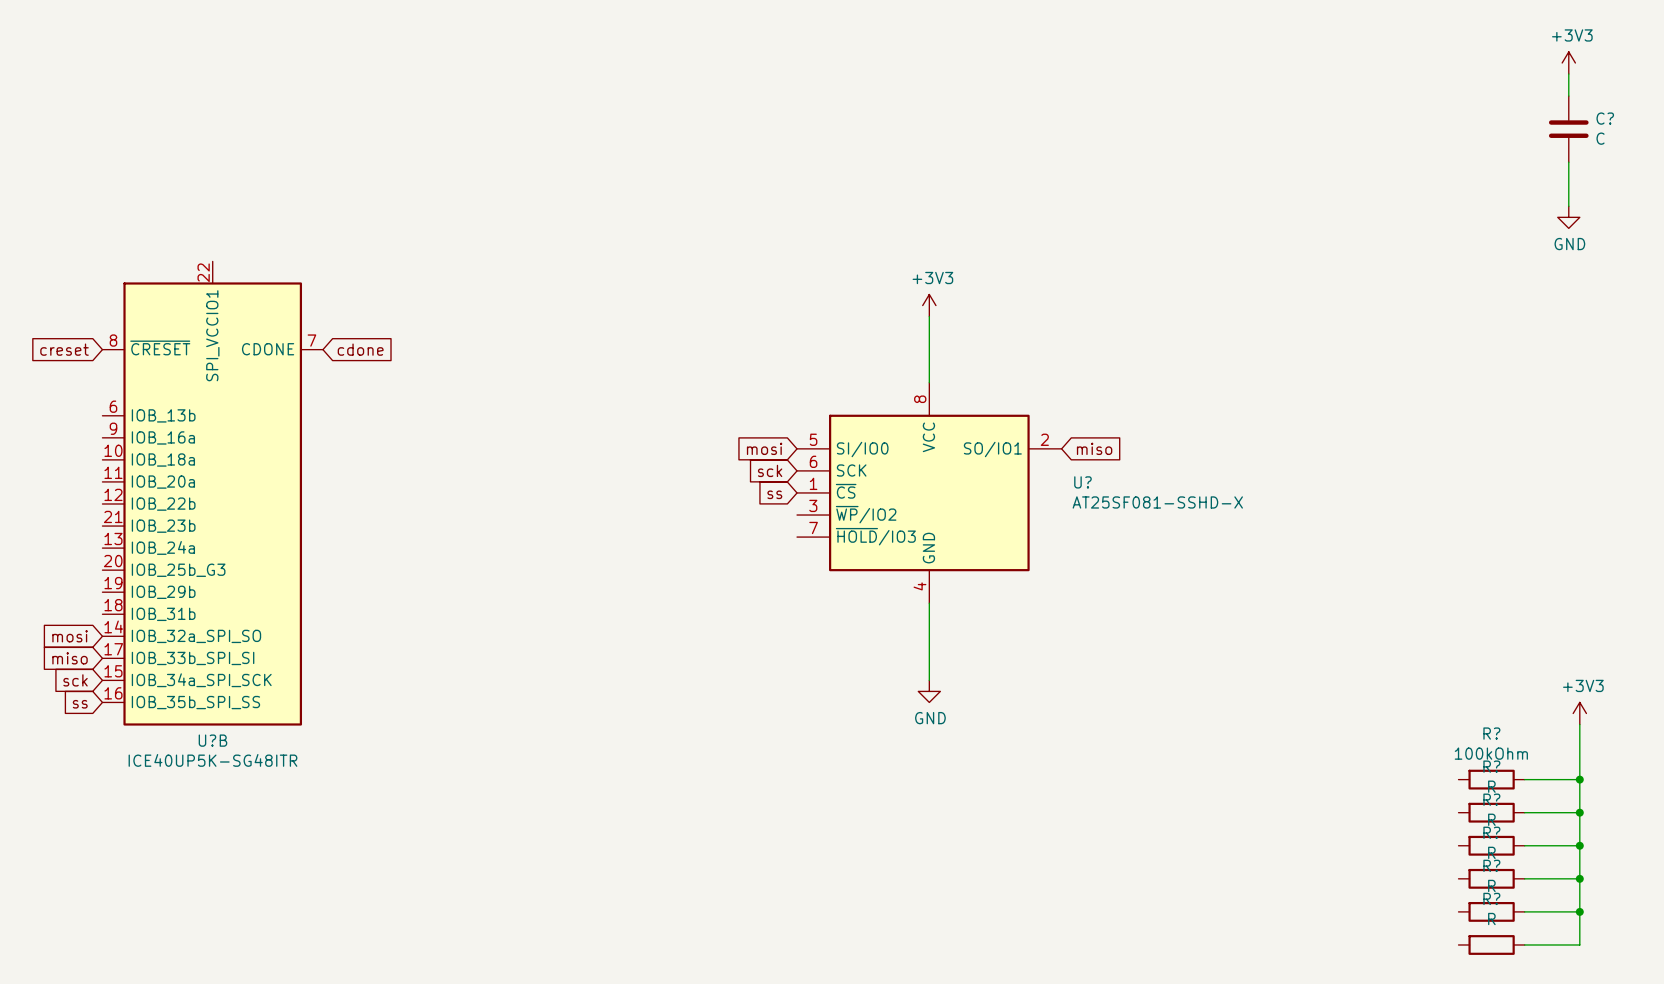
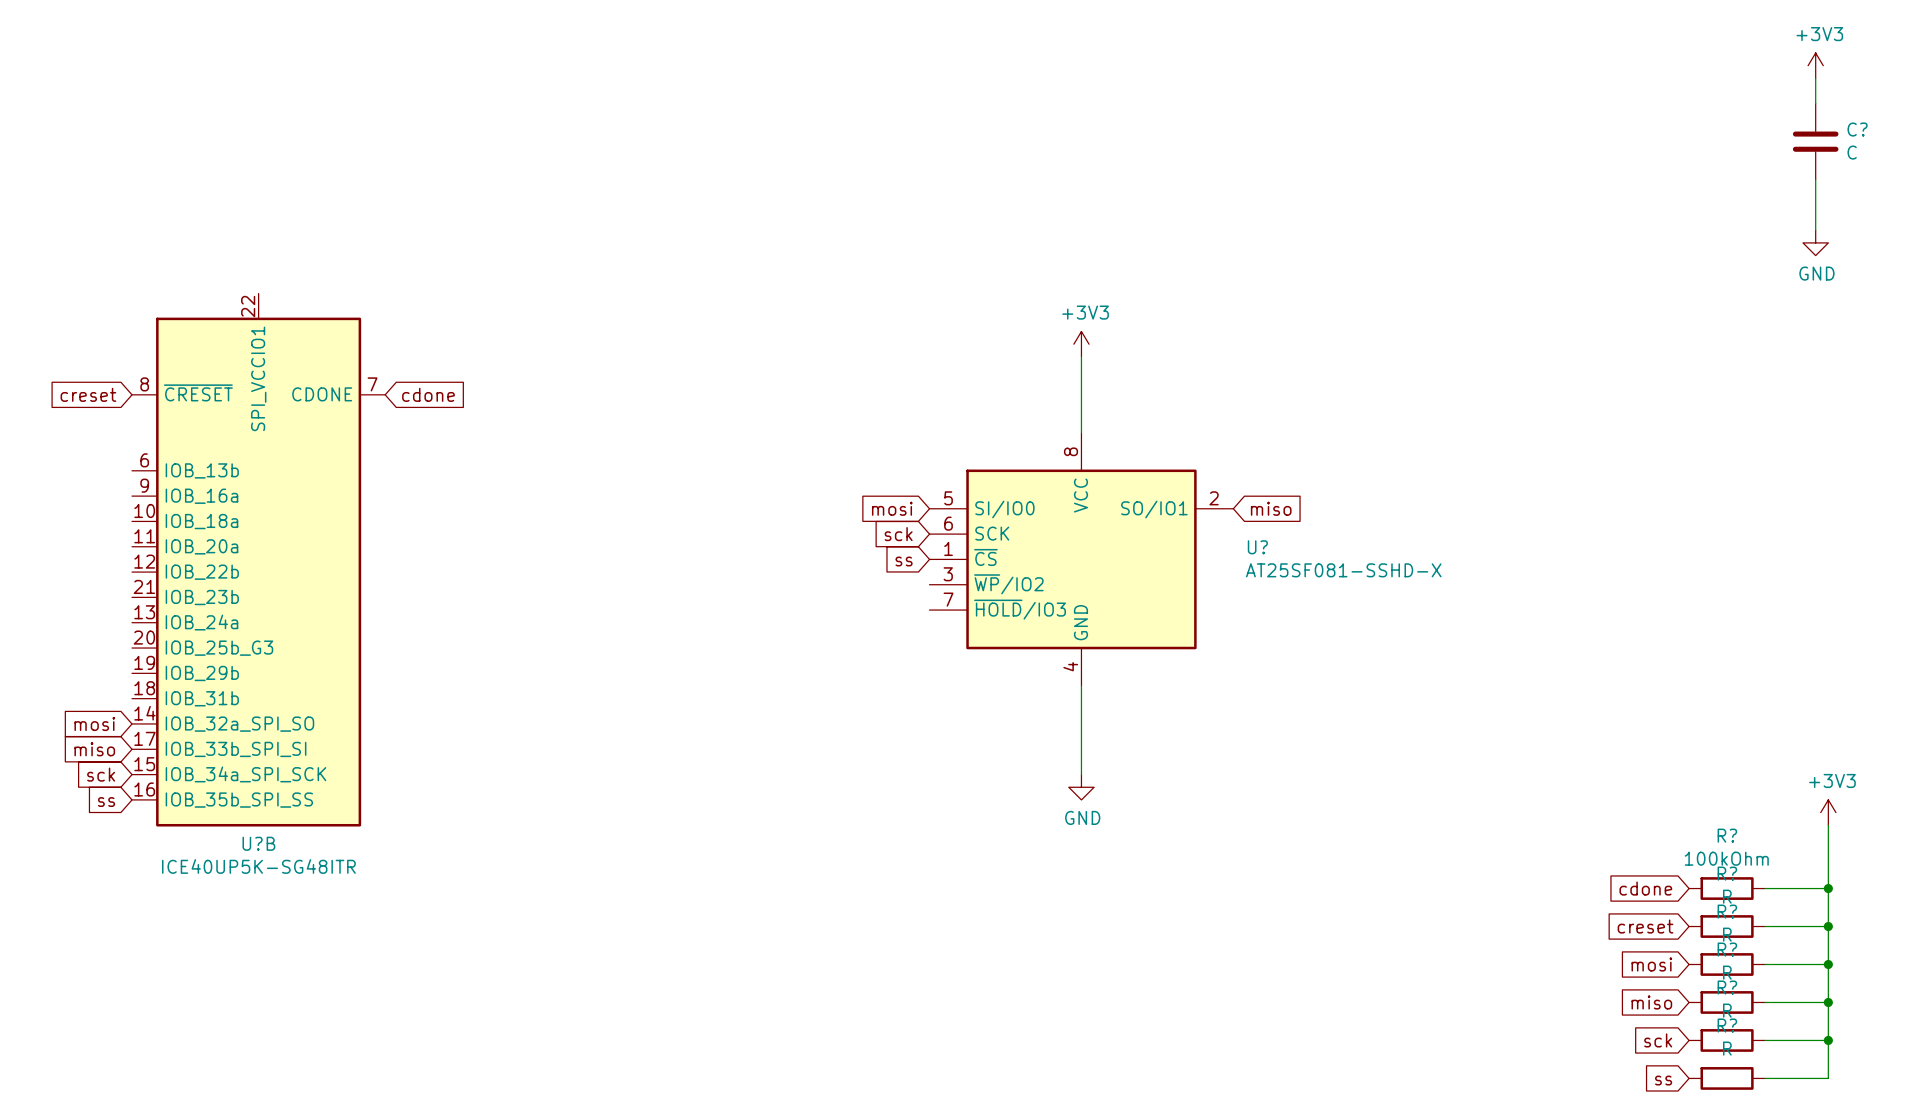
global label: none -> cdone (1645, 888)
global label: none -> creset (1645, 926)
global label: none -> mosi (1651, 964)
global label: none -> miso (1651, 1002)
global label: none -> sck (1658, 1040)
global label: none -> ss (1663, 1080)

